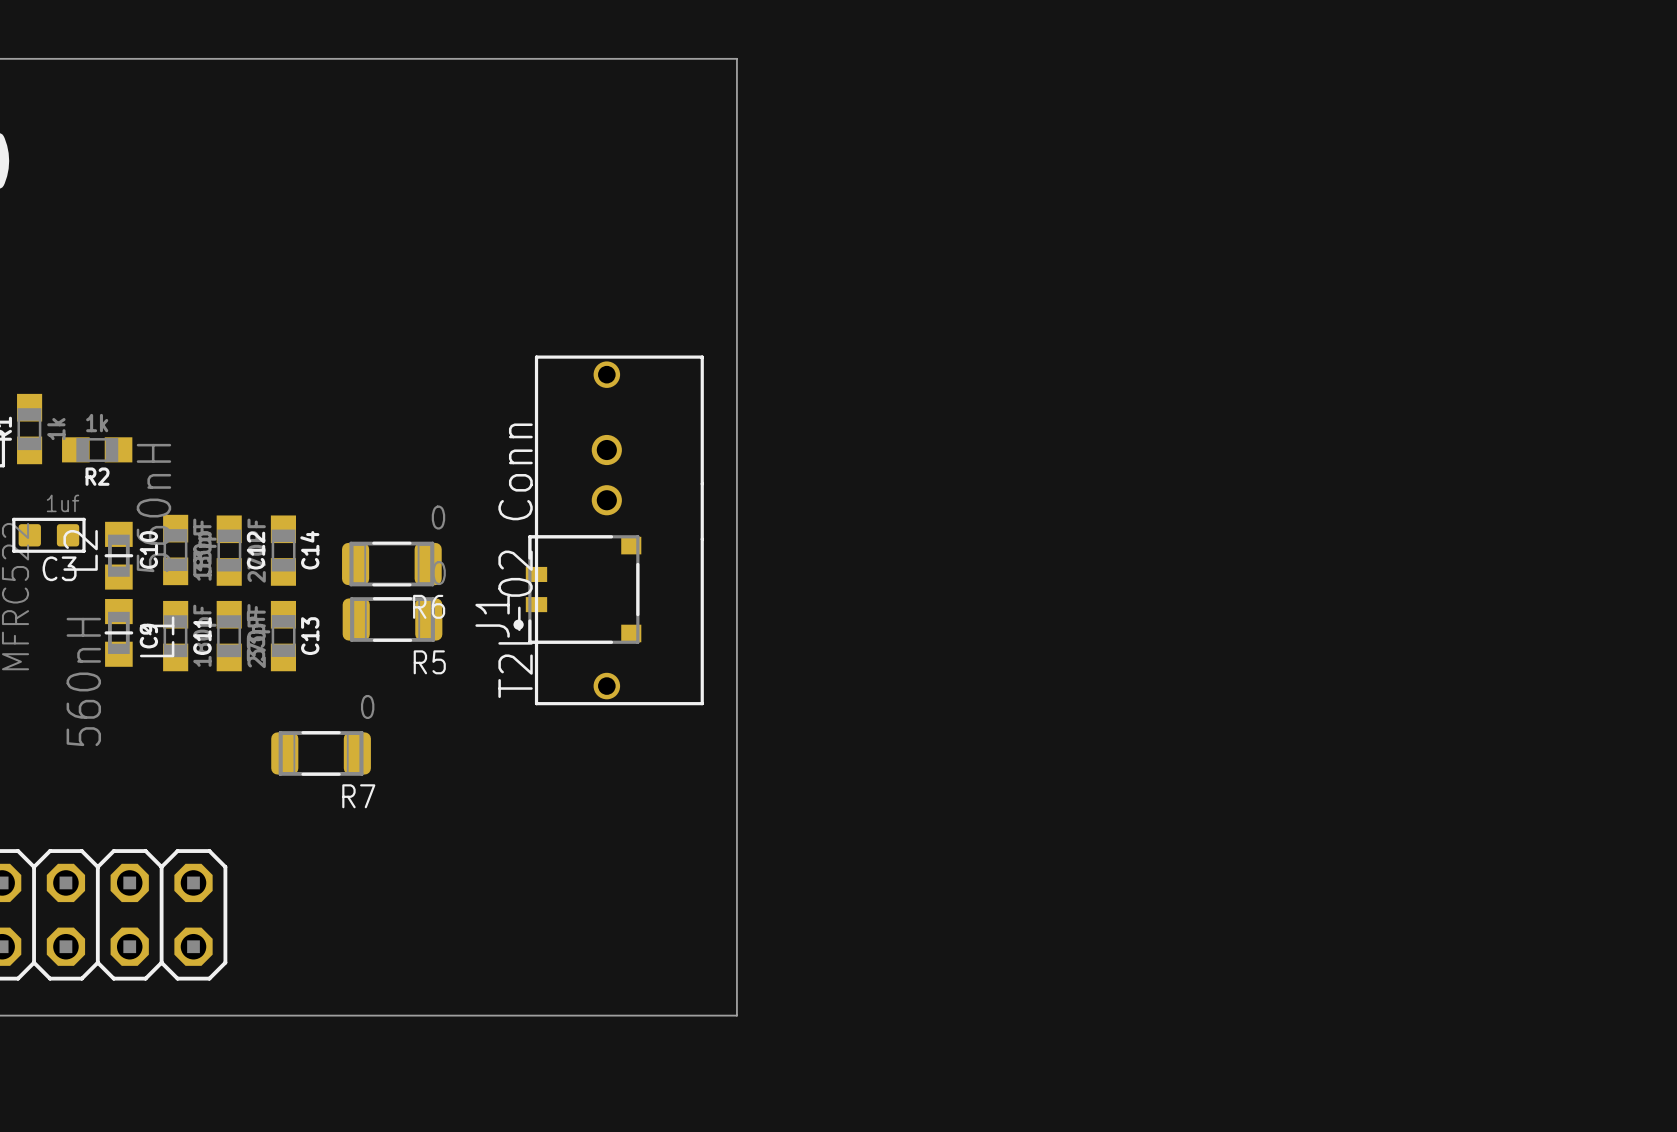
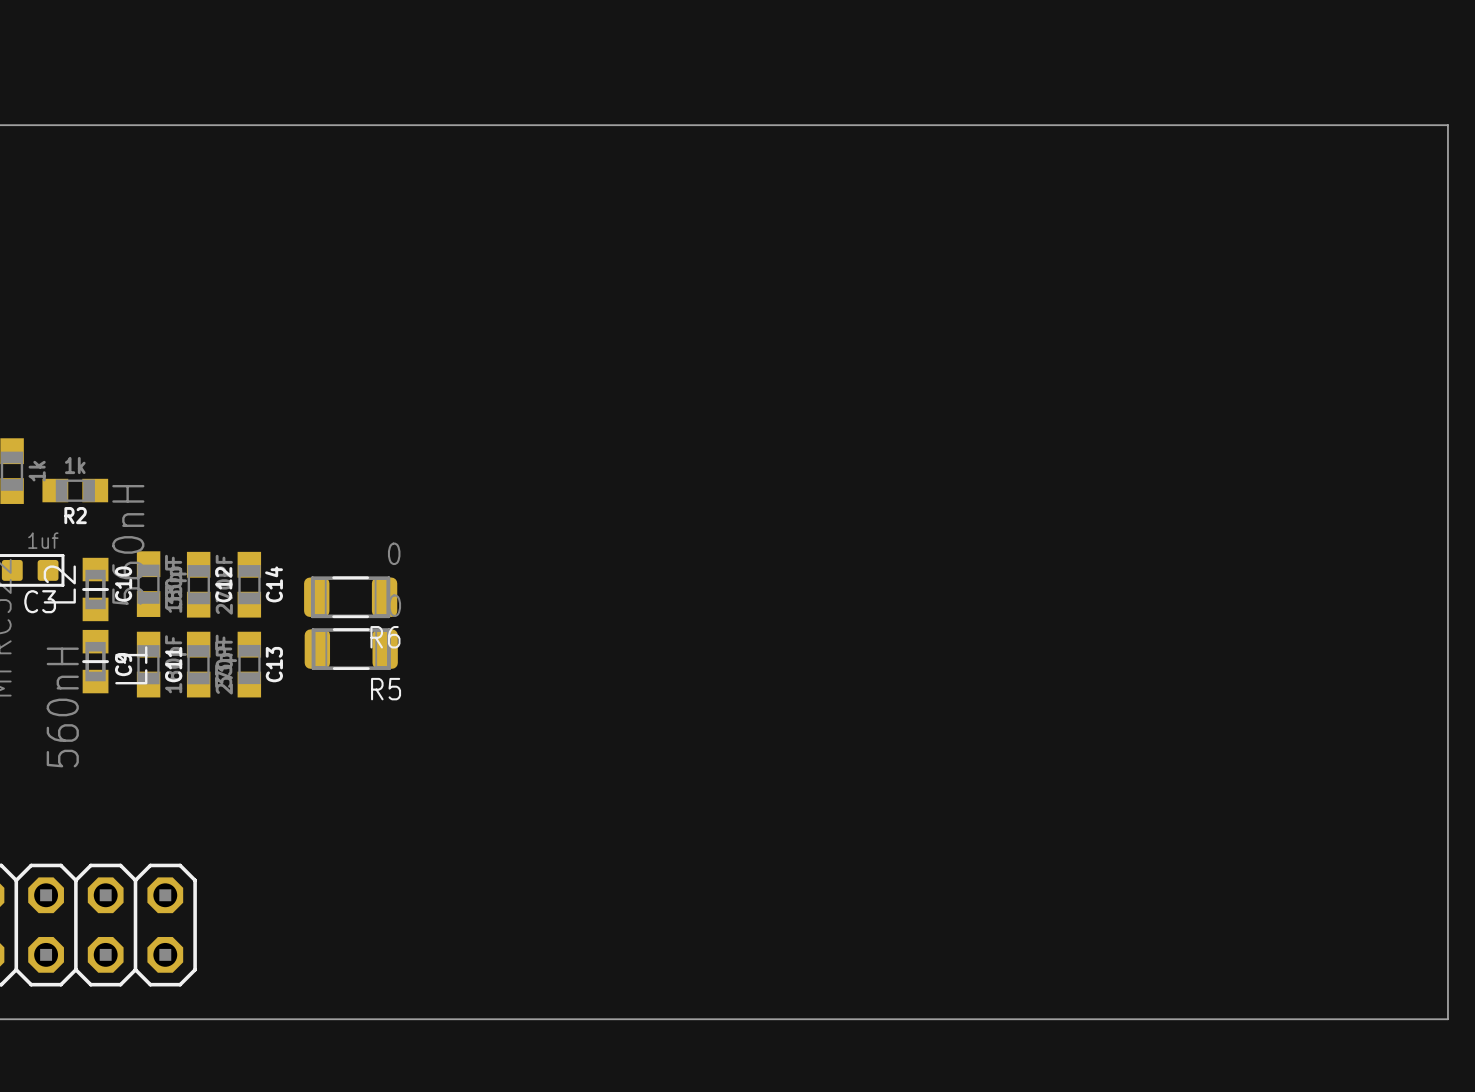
board edge: (736, 58) (736, 1015) -> (673, 125) (1447, 125) (1447, 1019) (673, 1019)
part: (619, 530) -> none
J1: (577, 589) -> none
R7: 0 (321, 753) -> none

